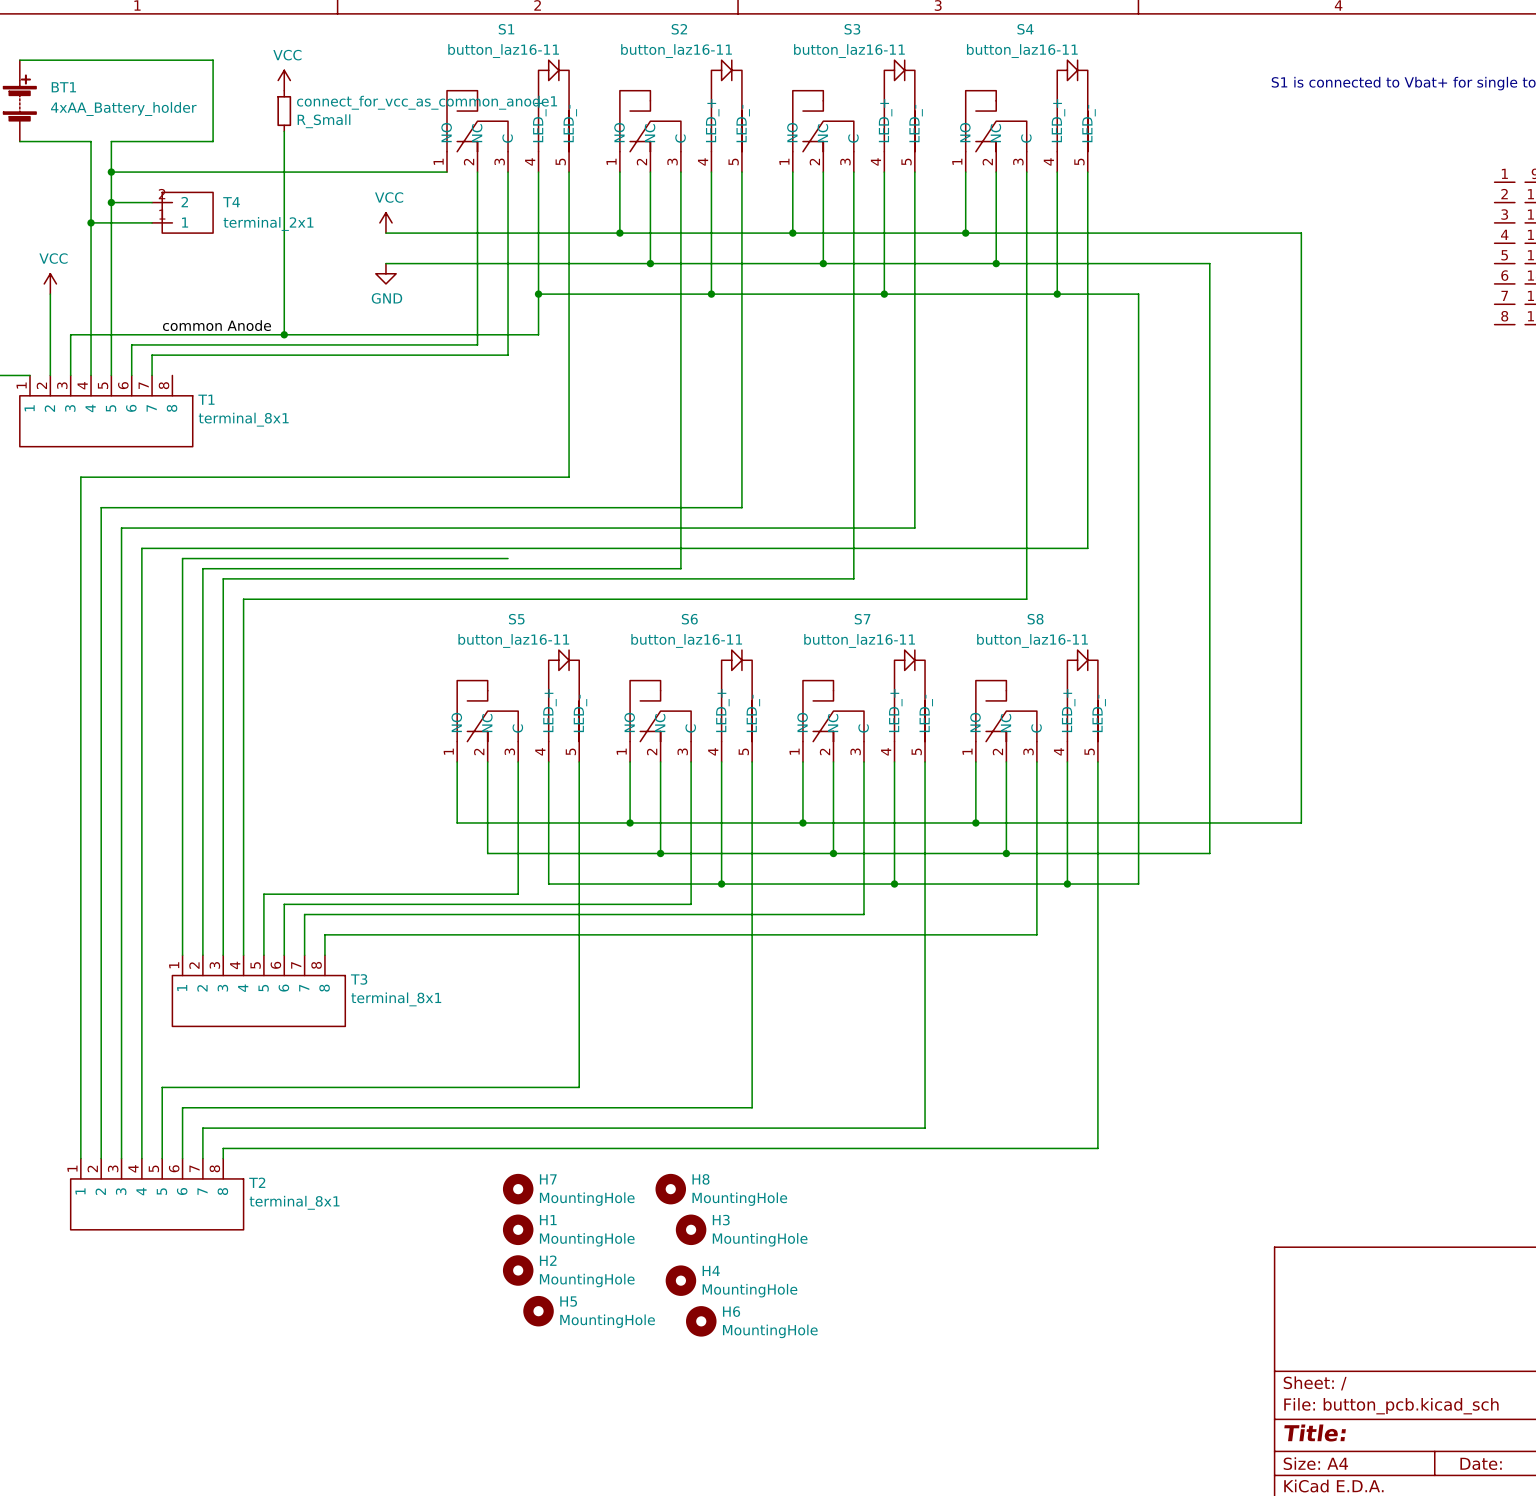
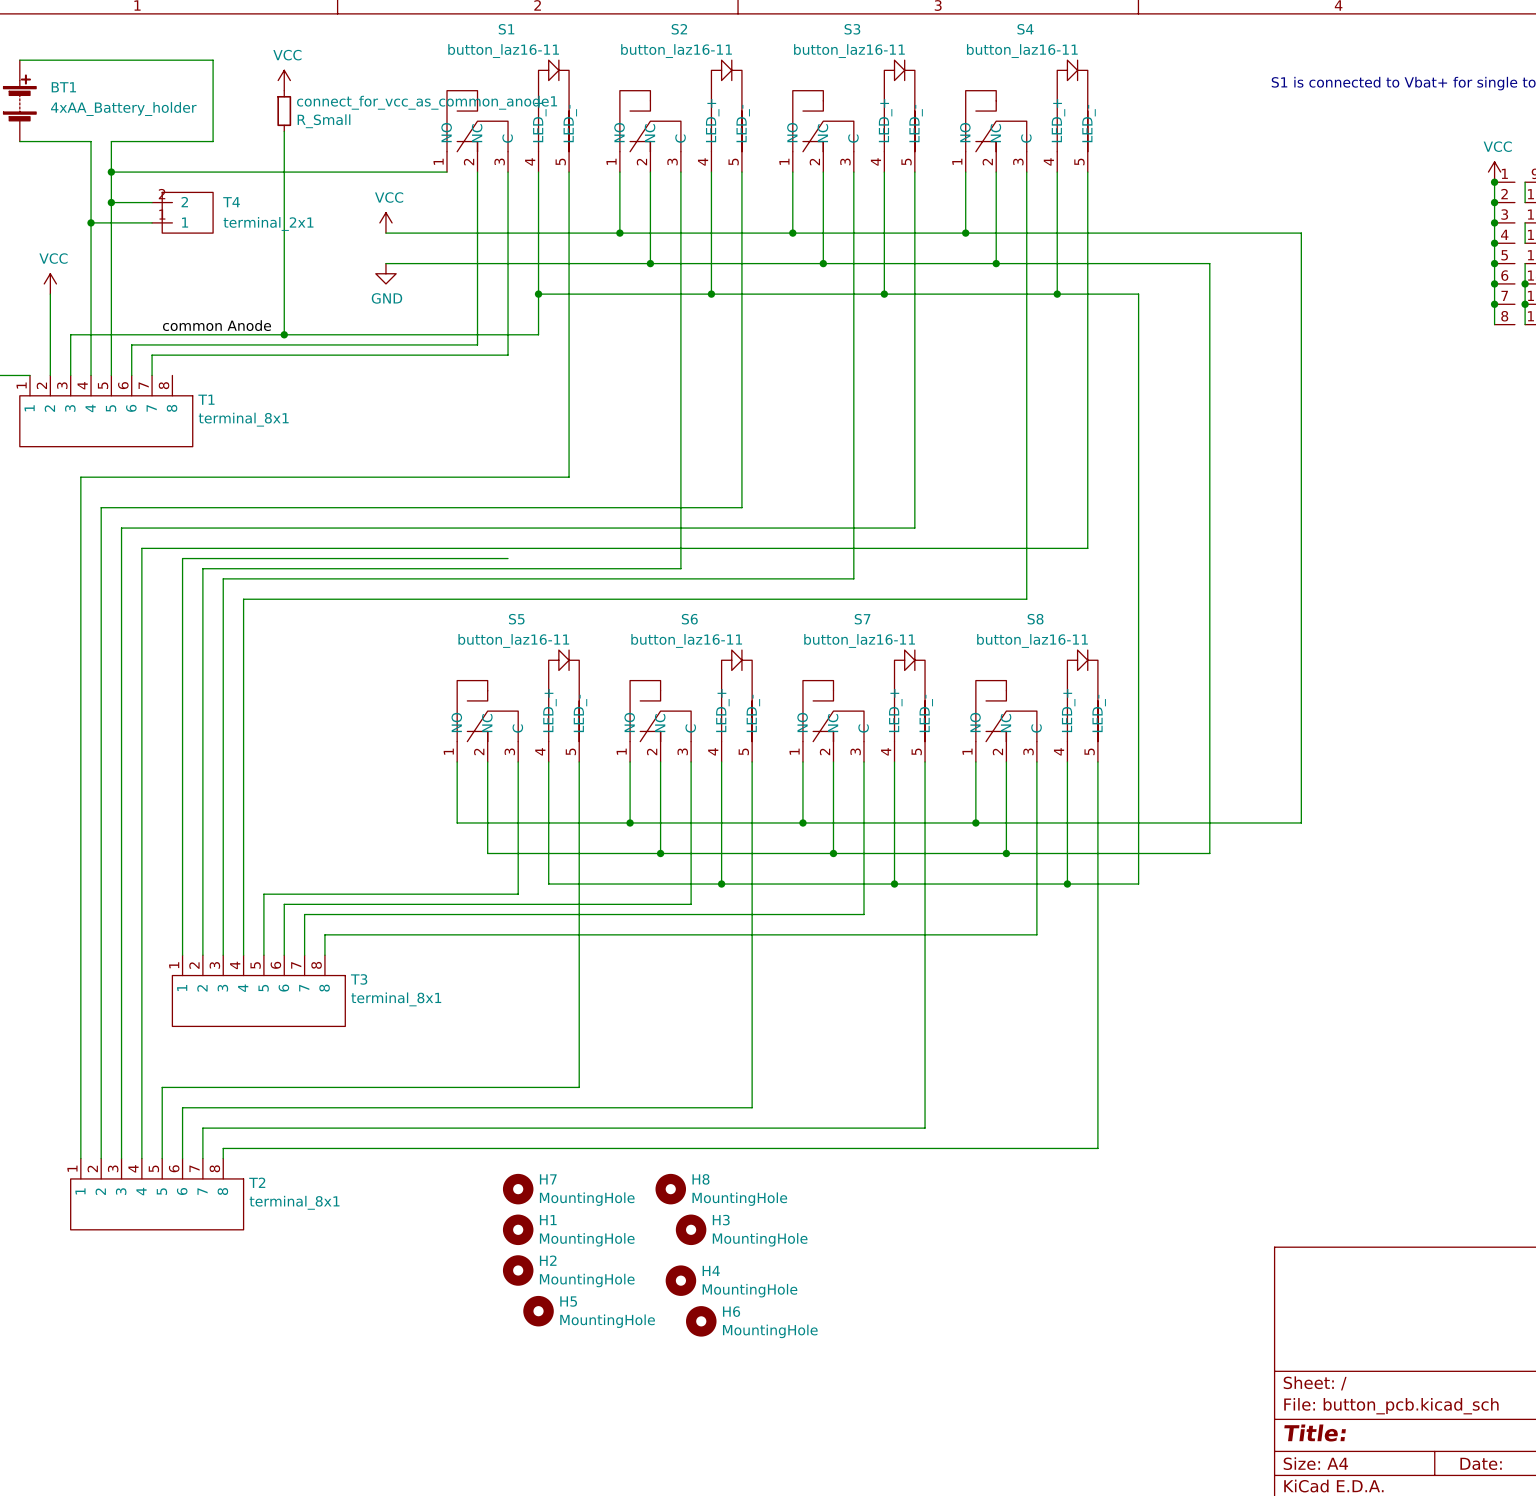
power symbol: none -> VCC (1494, 172)
wire: none -> (1494, 182) (1494, 324)
junction: none -> (1494, 182)
wire: none -> (1525, 182) (1525, 202)
junction: none -> (1494, 202)
junction: none -> (1494, 222)
wire: none -> (1525, 222) (1525, 243)
junction: none -> (1494, 243)
junction: none -> (1494, 263)
wire: none -> (1525, 263) (1525, 324)
junction: none -> (1494, 283)
junction: none -> (1525, 283)
junction: none -> (1494, 304)
junction: none -> (1525, 304)

